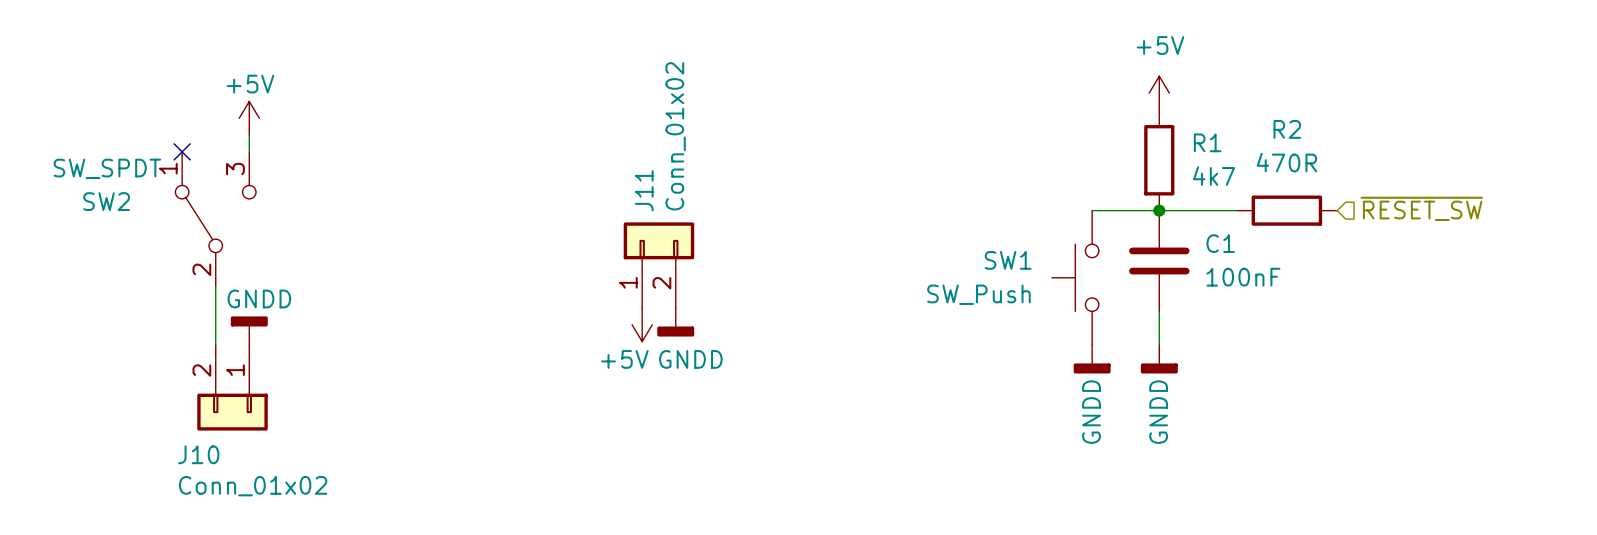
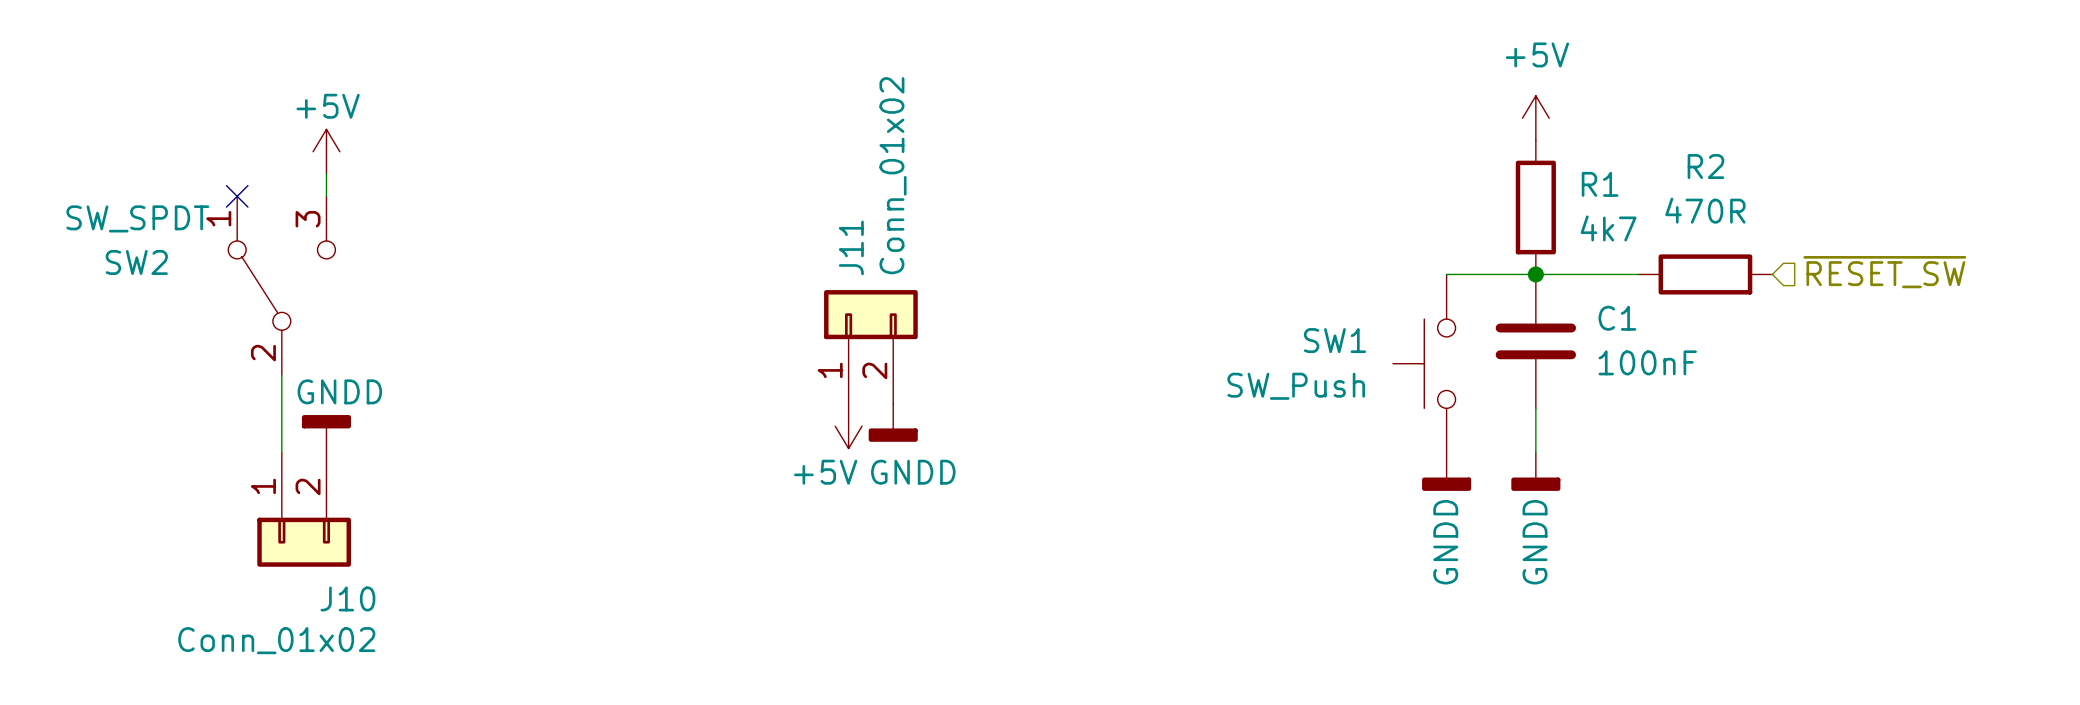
J10 flip: as is (232, 412) -> left-right (304, 542)

